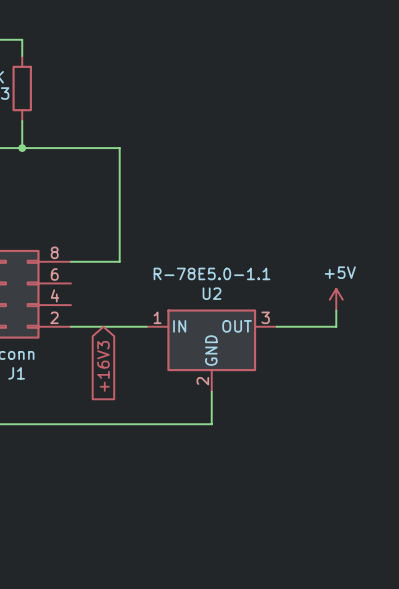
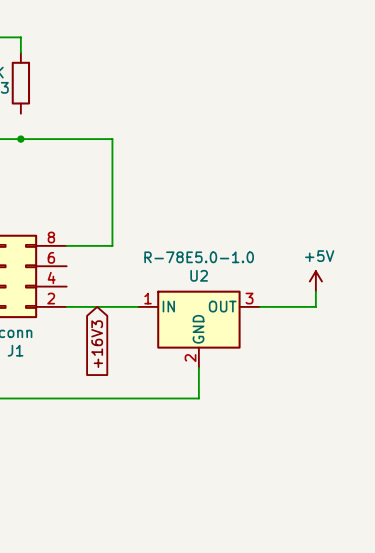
wire: (22, 121) (22, 148) -> none
R-78E5.0-1.1 name: R-78E5.0-1.1 (212, 273) -> R-78E5.0-1.0 (199, 257)

